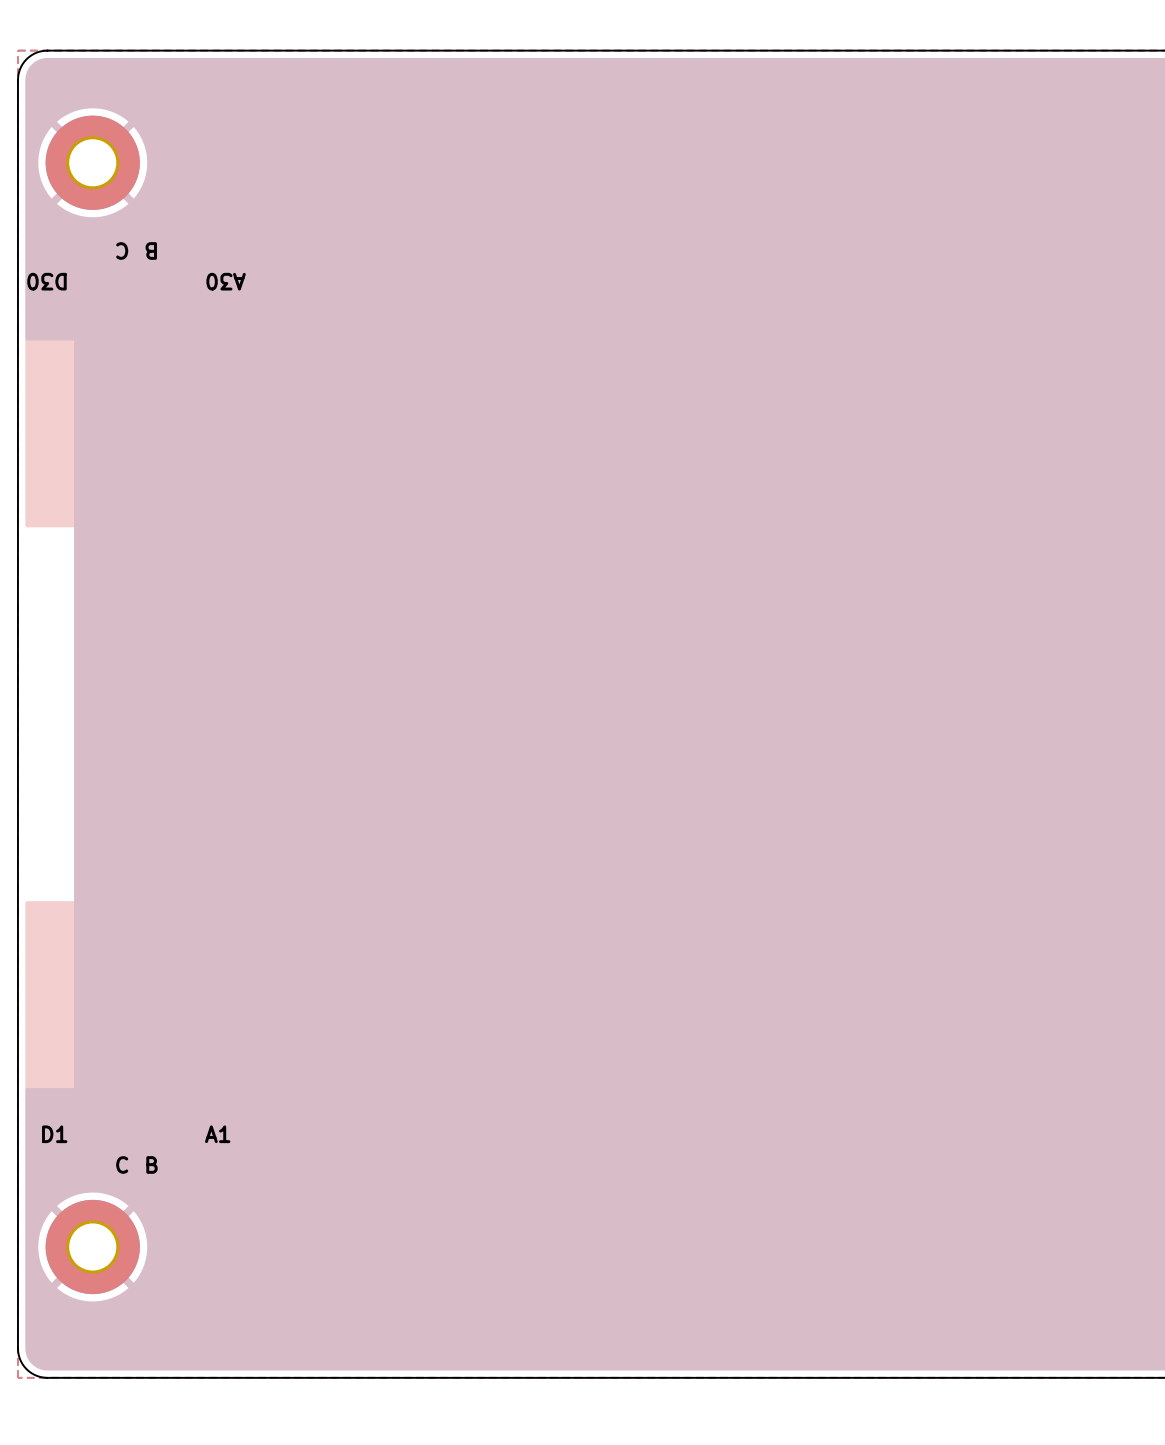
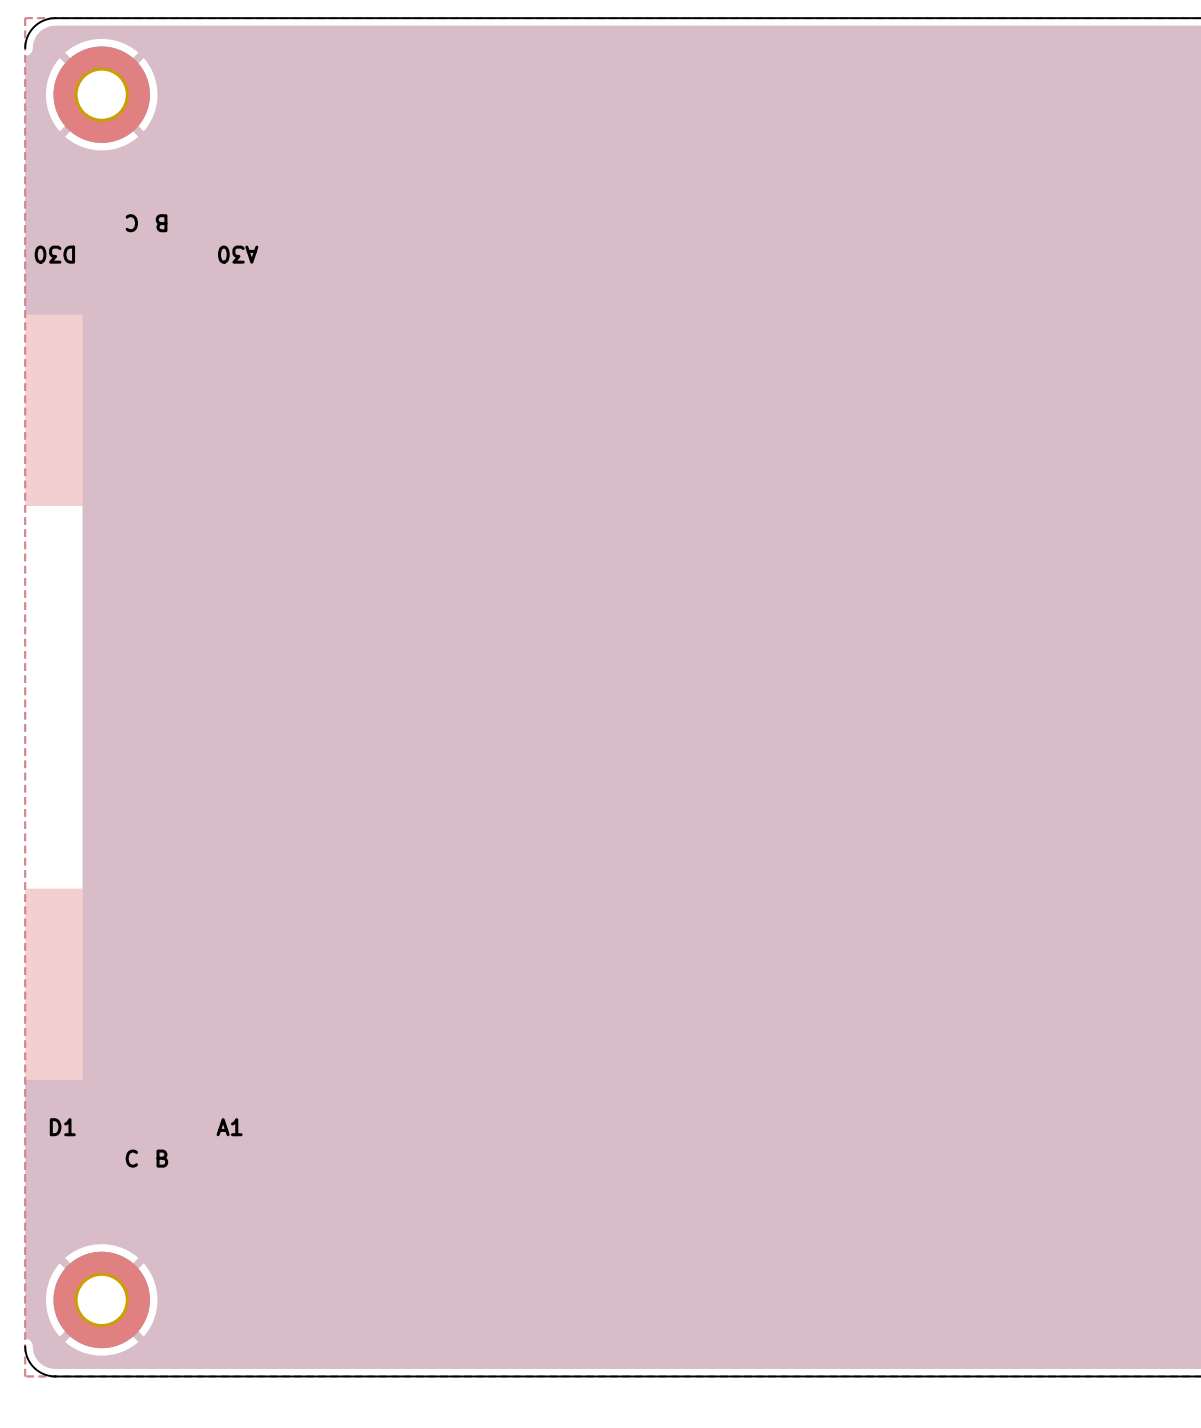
board edge: (17, 80) (17, 1348) -> none
part position: (92, 162) -> (101, 94)
part position: (92, 1246) -> (101, 1299)

